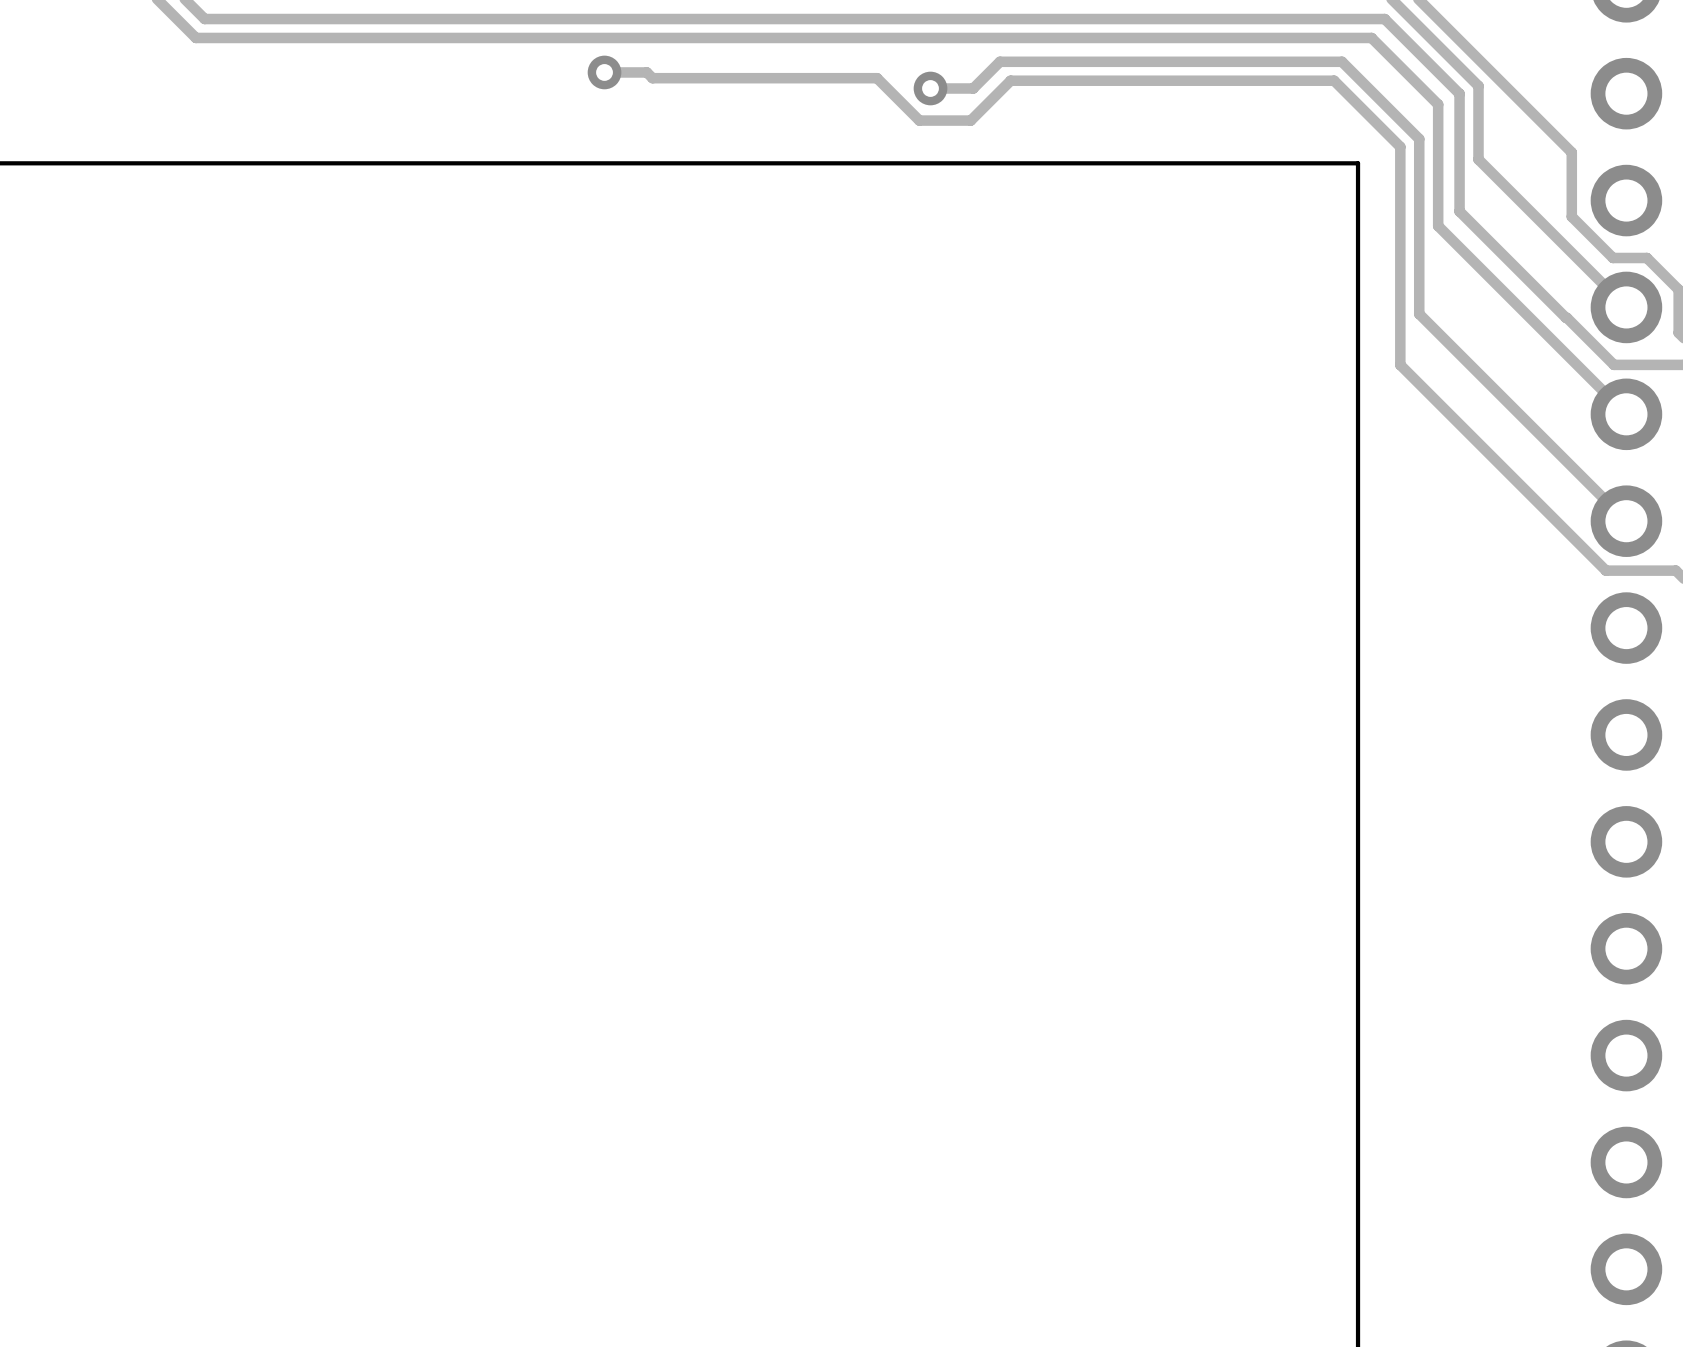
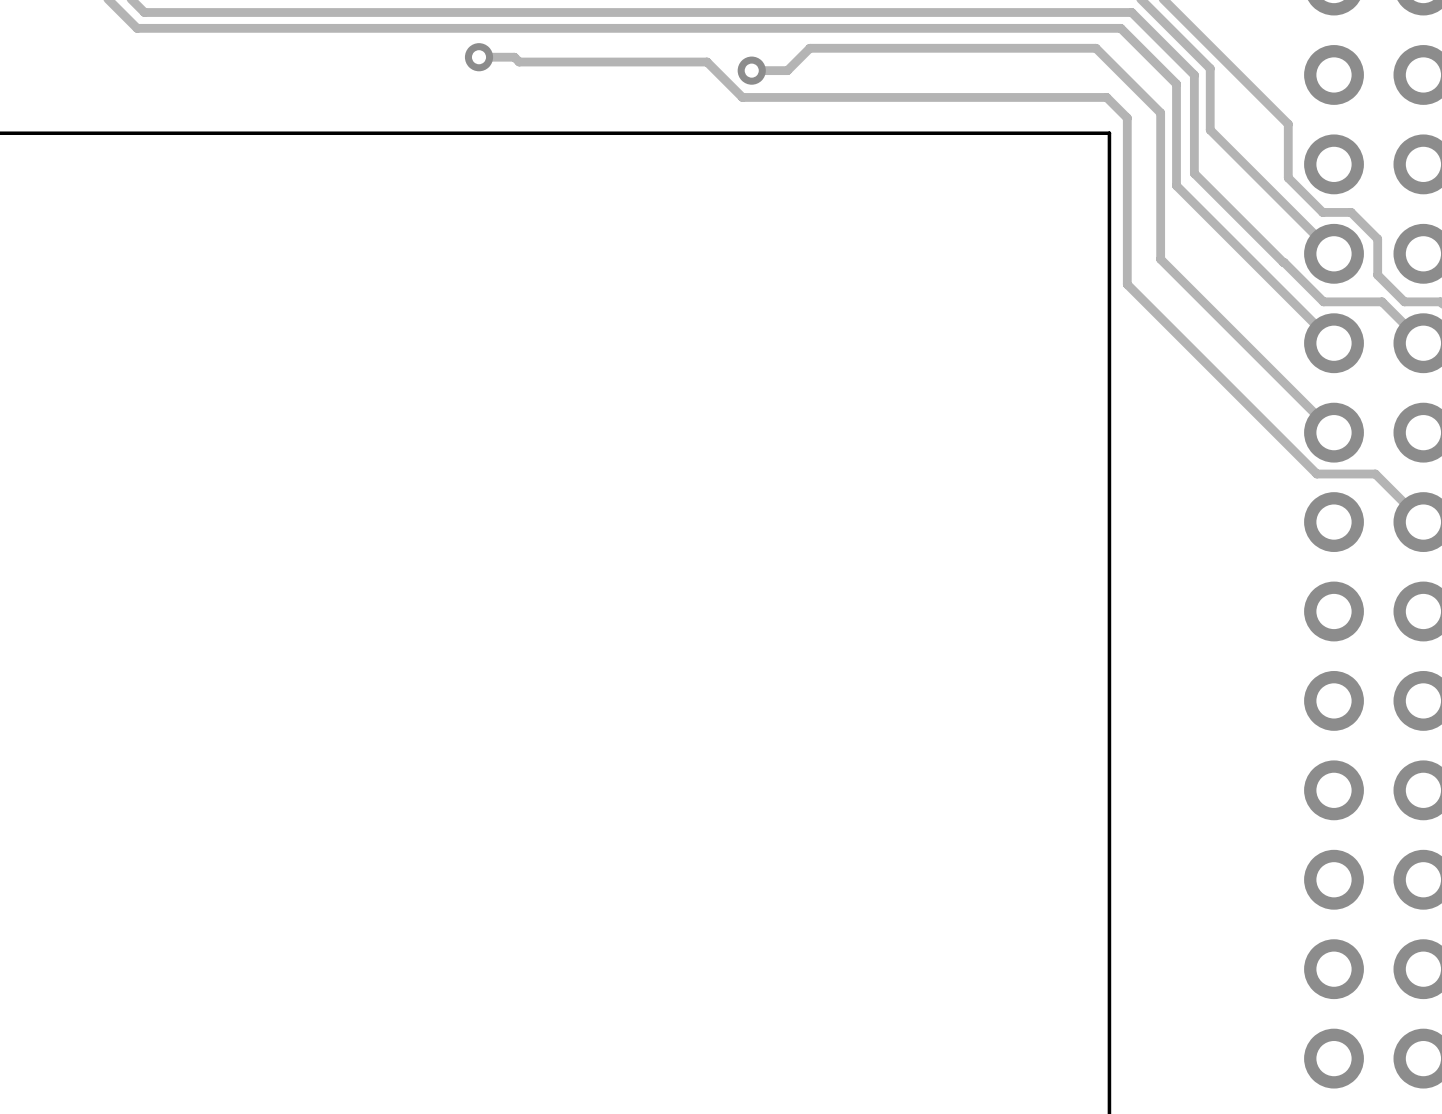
track: (970, 120) (1010, 80) (1334, 80) (1400, 146) (1400, 364) -> (785, 97) (1106, 97) (1127, 118) (1127, 284) (1144, 301)

